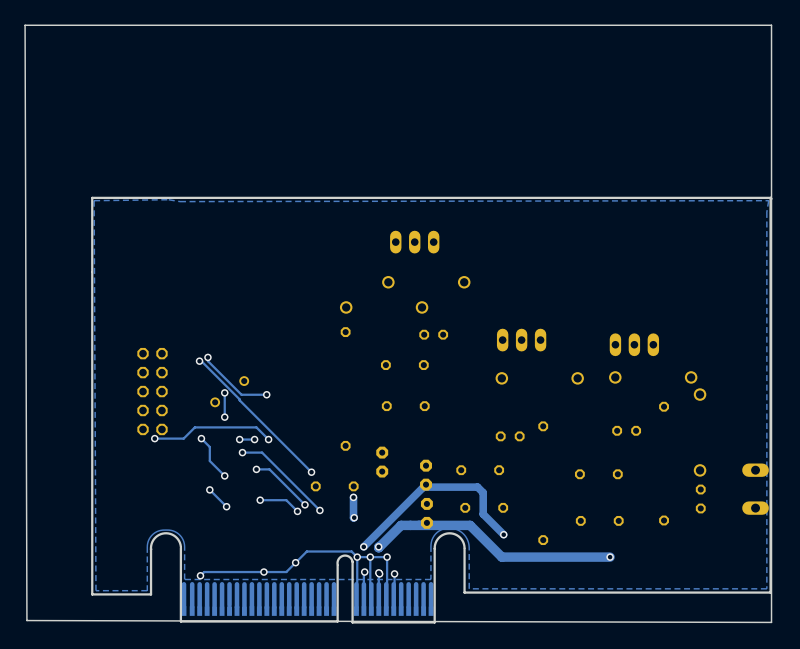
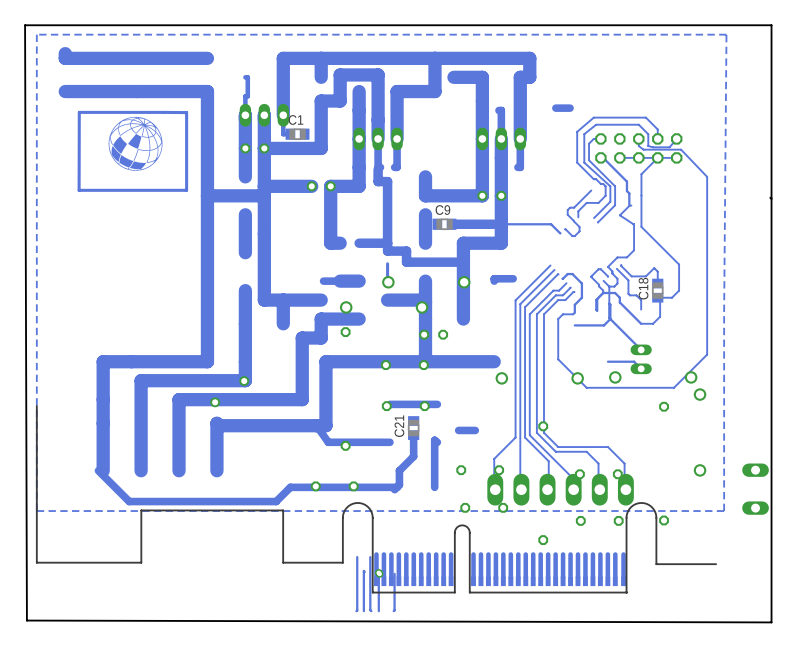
zone outline: none -> (726, 34) (36, 34) (36, 511) (724, 511) (726, 34)
track: none -> (65, 53) (65, 58) (207, 58)
track: none -> (321, 58) (321, 77)
track: none -> (434, 58) (434, 91) (397, 91) (397, 167) (394, 167)
track: none -> (245, 77) (247, 77) (247, 96) (245, 96) (245, 176)
track: none -> (453, 77) (482, 77) (482, 195) (425, 195) (425, 176)
track: none -> (65, 91) (207, 91) (207, 361) (103, 361) (103, 470)
track: none -> (359, 91) (359, 186) (330, 186) (330, 243) (340, 243)
track: none -> (570, 108) (555, 108)
track: none -> (498, 110) (501, 110) (501, 243) (463, 243) (463, 319)
track: none -> (163, 112) (79, 112) (79, 190) (186, 190) (186, 112) (163, 112)
track: none -> (264, 115) (264, 300) (321, 300)
part: none -> (264, 115)
drawing: none -> [108, 116, 163, 171]
track: none -> (290, 134) (283, 134) (283, 58) (529, 58) (529, 77) (520, 77) (520, 167) (517, 167)
C1: none -> (297, 134)
part: none -> (378, 138)
part: none -> (501, 138)
track: none -> (600, 138) (593, 138) (589, 143) (589, 160) (615, 186) (615, 205) (598, 222)
track: none -> (638, 138) (638, 146) (643, 149) (681, 149) (707, 176) (707, 354) (673, 387) (586, 387) (558, 359) (558, 319) (562, 314) (573, 314) (574, 304) (581, 297) (581, 283) (572, 274) (567, 274) (562, 278)
track: none -> (657, 138) (657, 129) (645, 117) (593, 117) (577, 131) (577, 162) (593, 179) (605, 186) (605, 195) (598, 202) (586, 202) (578, 211) (578, 217)
track: none -> (676, 138) (669, 147) (648, 146) (648, 134) (638, 124) (596, 124) (584, 134) (584, 162) (610, 186) (610, 201) (594, 218)
part: none -> (254, 148)
track: none -> (264, 148) (321, 148) (321, 101) (340, 101) (340, 74) (378, 74) (378, 167) (380, 167) (378, 169) (378, 181) (387, 181) (387, 251) (406, 251) (406, 262) (463, 262)
part: none -> (638, 148)
track: none -> (600, 157) (603, 157) (626, 181) (629, 205)
track: none -> (657, 157) (641, 174) (641, 226) (679, 264) (679, 290) (671, 297) (657, 297) (660, 300) (660, 316) (653, 323) (641, 323) (619, 302) (619, 297) (615, 292) (603, 292)
track: none -> (676, 157) (619, 157)
track: none -> (311, 186) (264, 186)
part: none -> (321, 186)
track: none -> (591, 190) (574, 207) (567, 210) (567, 214) (579, 226) (579, 231) (572, 236) (565, 229)
track: none -> (264, 195) (207, 195)
part: none -> (491, 195)
zone outline: (168, 199) (94, 200) (95, 590) (147, 590) (147, 542) (153, 533) (161, 530) (174, 531) (183, 540) (184, 579) (430, 579) (432, 539) (439, 530) (448, 528) (461, 532) (468, 542) (469, 588) (766, 588) (766, 211) (768, 200) (179, 201) (168, 199) -> none
track: none -> (631, 205) (619, 215) (634, 224) (634, 250) (626, 257) (617, 257) (607, 266) (617, 278) (617, 283) (614, 286) (609, 286)
track: none -> (245, 214) (245, 252)
track: none -> (425, 214) (425, 243)
C9: none -> (444, 224)
track: none -> (498, 224) (551, 224) (560, 233)
track: none -> (501, 224) (451, 224)
part: (414, 242) -> none
track: none -> (387, 243) (359, 243)
track: none -> (387, 263) (387, 281)
track: none -> (621, 264) (631, 276) (645, 276) (654, 268) (657, 271) (657, 283)
track: none -> (550, 265) (515, 300) (515, 437) (494, 458) (495, 489)
track: none -> (616, 268) (628, 280) (628, 293) (636, 295) (641, 300) (641, 309)
track: none -> (554, 269) (520, 304) (521, 489)
board edge: (92, 271) (92, 197) (770, 197) (770, 592) (464, 592) (464, 548) -> none
board edge: (92, 272) (92, 594) (151, 594) (151, 548) -> none
track: none -> (558, 274) (525, 307) (525, 437) (548, 461) (547, 489)
track: none -> (607, 276) (600, 269) (591, 276) (603, 292)
track: none -> (513, 278) (494, 278) (494, 281)
track: none -> (603, 280) (609, 286)
track: none -> (359, 281) (323, 281)
track: none -> (425, 281) (425, 361)
track: none -> (566, 283) (559, 290) (553, 290) (529, 314) (529, 435) (574, 480) (573, 489)
track: none -> (609, 286) (609, 303)
track: none -> (570, 287) (562, 295) (555, 295) (536, 314) (536, 432) (555, 451) (586, 451) (598, 463) (599, 489)
track: none -> (245, 290) (245, 380) (141, 380) (141, 470)
C18: none -> (657, 290)
track: none -> (574, 292) (565, 300) (558, 300) (544, 314) (544, 432) (558, 447) (607, 447) (624, 463) (625, 489)
track: none -> (603, 292) (597, 299) (597, 310) (596, 300) (603, 292)
track: none -> (283, 300) (283, 323)
track: none -> (387, 300) (423, 300) (425, 302)
track: none -> (609, 303) (610, 319) (604, 325) (574, 325)
track: none -> (609, 303) (609, 318) (641, 349)
track: none -> (359, 319) (321, 319) (321, 338) (302, 338) (302, 399) (179, 399) (179, 470)
part: (521, 340) -> none
part: (634, 344) -> none
track: (207, 357) (207, 361) (241, 394) (266, 394) -> none
via: (207, 357) -> none
part: none -> (641, 359)
track: (199, 361) (311, 472) -> none
via: (199, 361) -> none
track: none -> (494, 361) (325, 361) (325, 425) (219, 425) (216, 423) (216, 470)
track: none -> (607, 361) (634, 361) (641, 368)
part: (152, 391) -> none
track: (224, 392) (224, 417) -> none
via: (224, 392) -> none
via: (266, 394) -> none
track: none -> (437, 404) (389, 404)
via: (224, 417) -> none
track: none -> (316, 425) (328, 442) (389, 442)
C21: none -> (413, 428)
track: none -> (475, 430) (458, 430)
part: (626, 430) -> none
track: none -> (413, 435) (413, 456) (399, 470) (399, 484) (394, 489)
part: (510, 436) -> none
track: (154, 438) (183, 438) (194, 427) (256, 427) (268, 439) -> none
via: (154, 438) -> none
track: (201, 438) (209, 447) (209, 461) (224, 475) -> none
via: (201, 438) -> none
via: (239, 439) -> none
track: (254, 439) (239, 439) -> none
via: (254, 439) -> none
via: (268, 439) -> none
track: none -> (437, 442) (434, 440) (434, 487)
track: (242, 452) (262, 452) (319, 510) -> none
via: (242, 452) -> none
part: (382, 462) -> none
track: (256, 469) (269, 469) (304, 504) -> none
via: (256, 469) -> none
track: none -> (98, 470) (129, 501) (276, 501) (290, 487) (397, 487)
via: (311, 472) -> none
via: (224, 475) -> none
part: (426, 475) -> none
track: (423, 487) (363, 546) -> none
track: (423, 487) (477, 487) (483, 492) (483, 514) (503, 534) -> none
track: (209, 489) (226, 506) -> none
via: (209, 489) -> none
part: none -> (560, 489)
via: (353, 497) -> none
part: (700, 498) -> none
track: (260, 500) (286, 500) (297, 511) -> none
via: (260, 500) -> none
track: (354, 503) (353, 497) (354, 517) -> none
via: (304, 504) -> none
via: (226, 506) -> none
via: (319, 510) -> none
via: (297, 511) -> none
part: (426, 513) -> none
via: (354, 517) -> none
via: (503, 534) -> none
board edge: (180, 546) (175, 536) (164, 533) (154, 538) (151, 549) -> none
via: (363, 546) -> none
track: (378, 546) (401, 525) (470, 525) (501, 557) (610, 557) -> none
via: (378, 546) -> none
board edge: (180, 547) (180, 621) (337, 621) (337, 565) -> none
board edge: (464, 547) (461, 538) (453, 533) (441, 535) (435, 542) (434, 622) (352, 622) (352, 560) (348, 556) (342, 555) (338, 559) (337, 564) -> none
via: (357, 557) -> none
via: (370, 557) -> none
via: (387, 557) -> none
via: (610, 557) -> none
via: (295, 562) -> none
via: (263, 572) -> none
via: (364, 572) -> none
via: (394, 573) -> none
track: (200, 575) (204, 572) (286, 572) (306, 551) (351, 551) (357, 557) (387, 557) (386, 611) -> none
via: (200, 575) -> none
part side: top (307, 598) -> bottom (376, 499)

